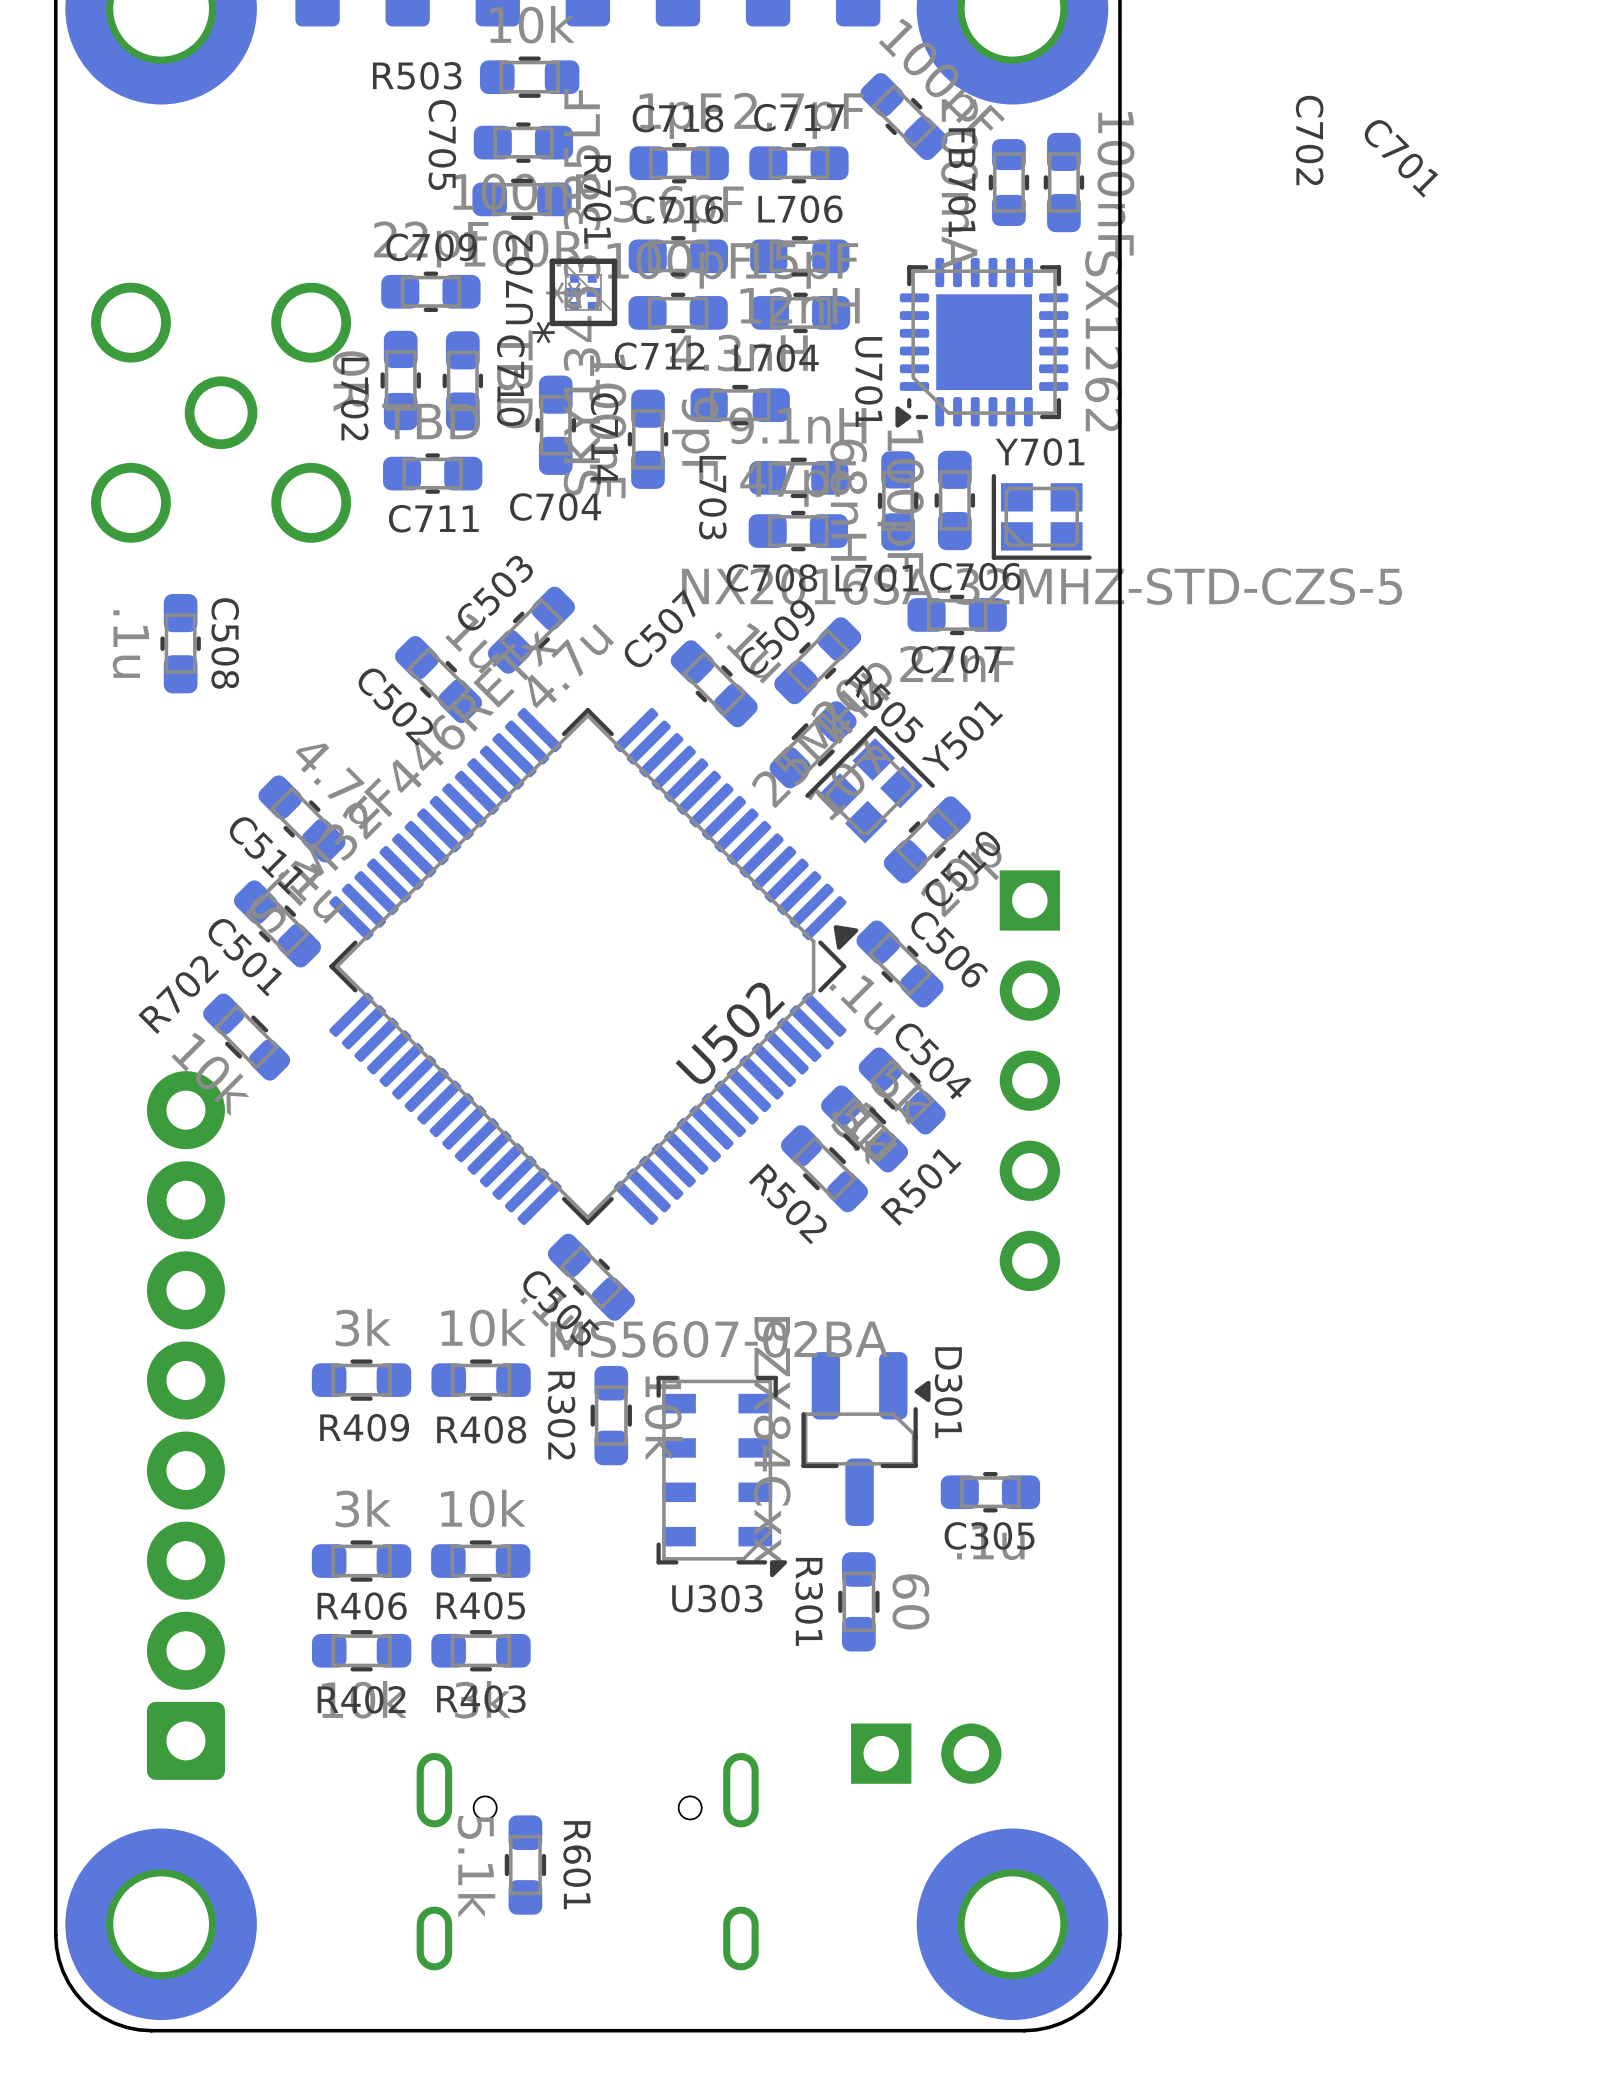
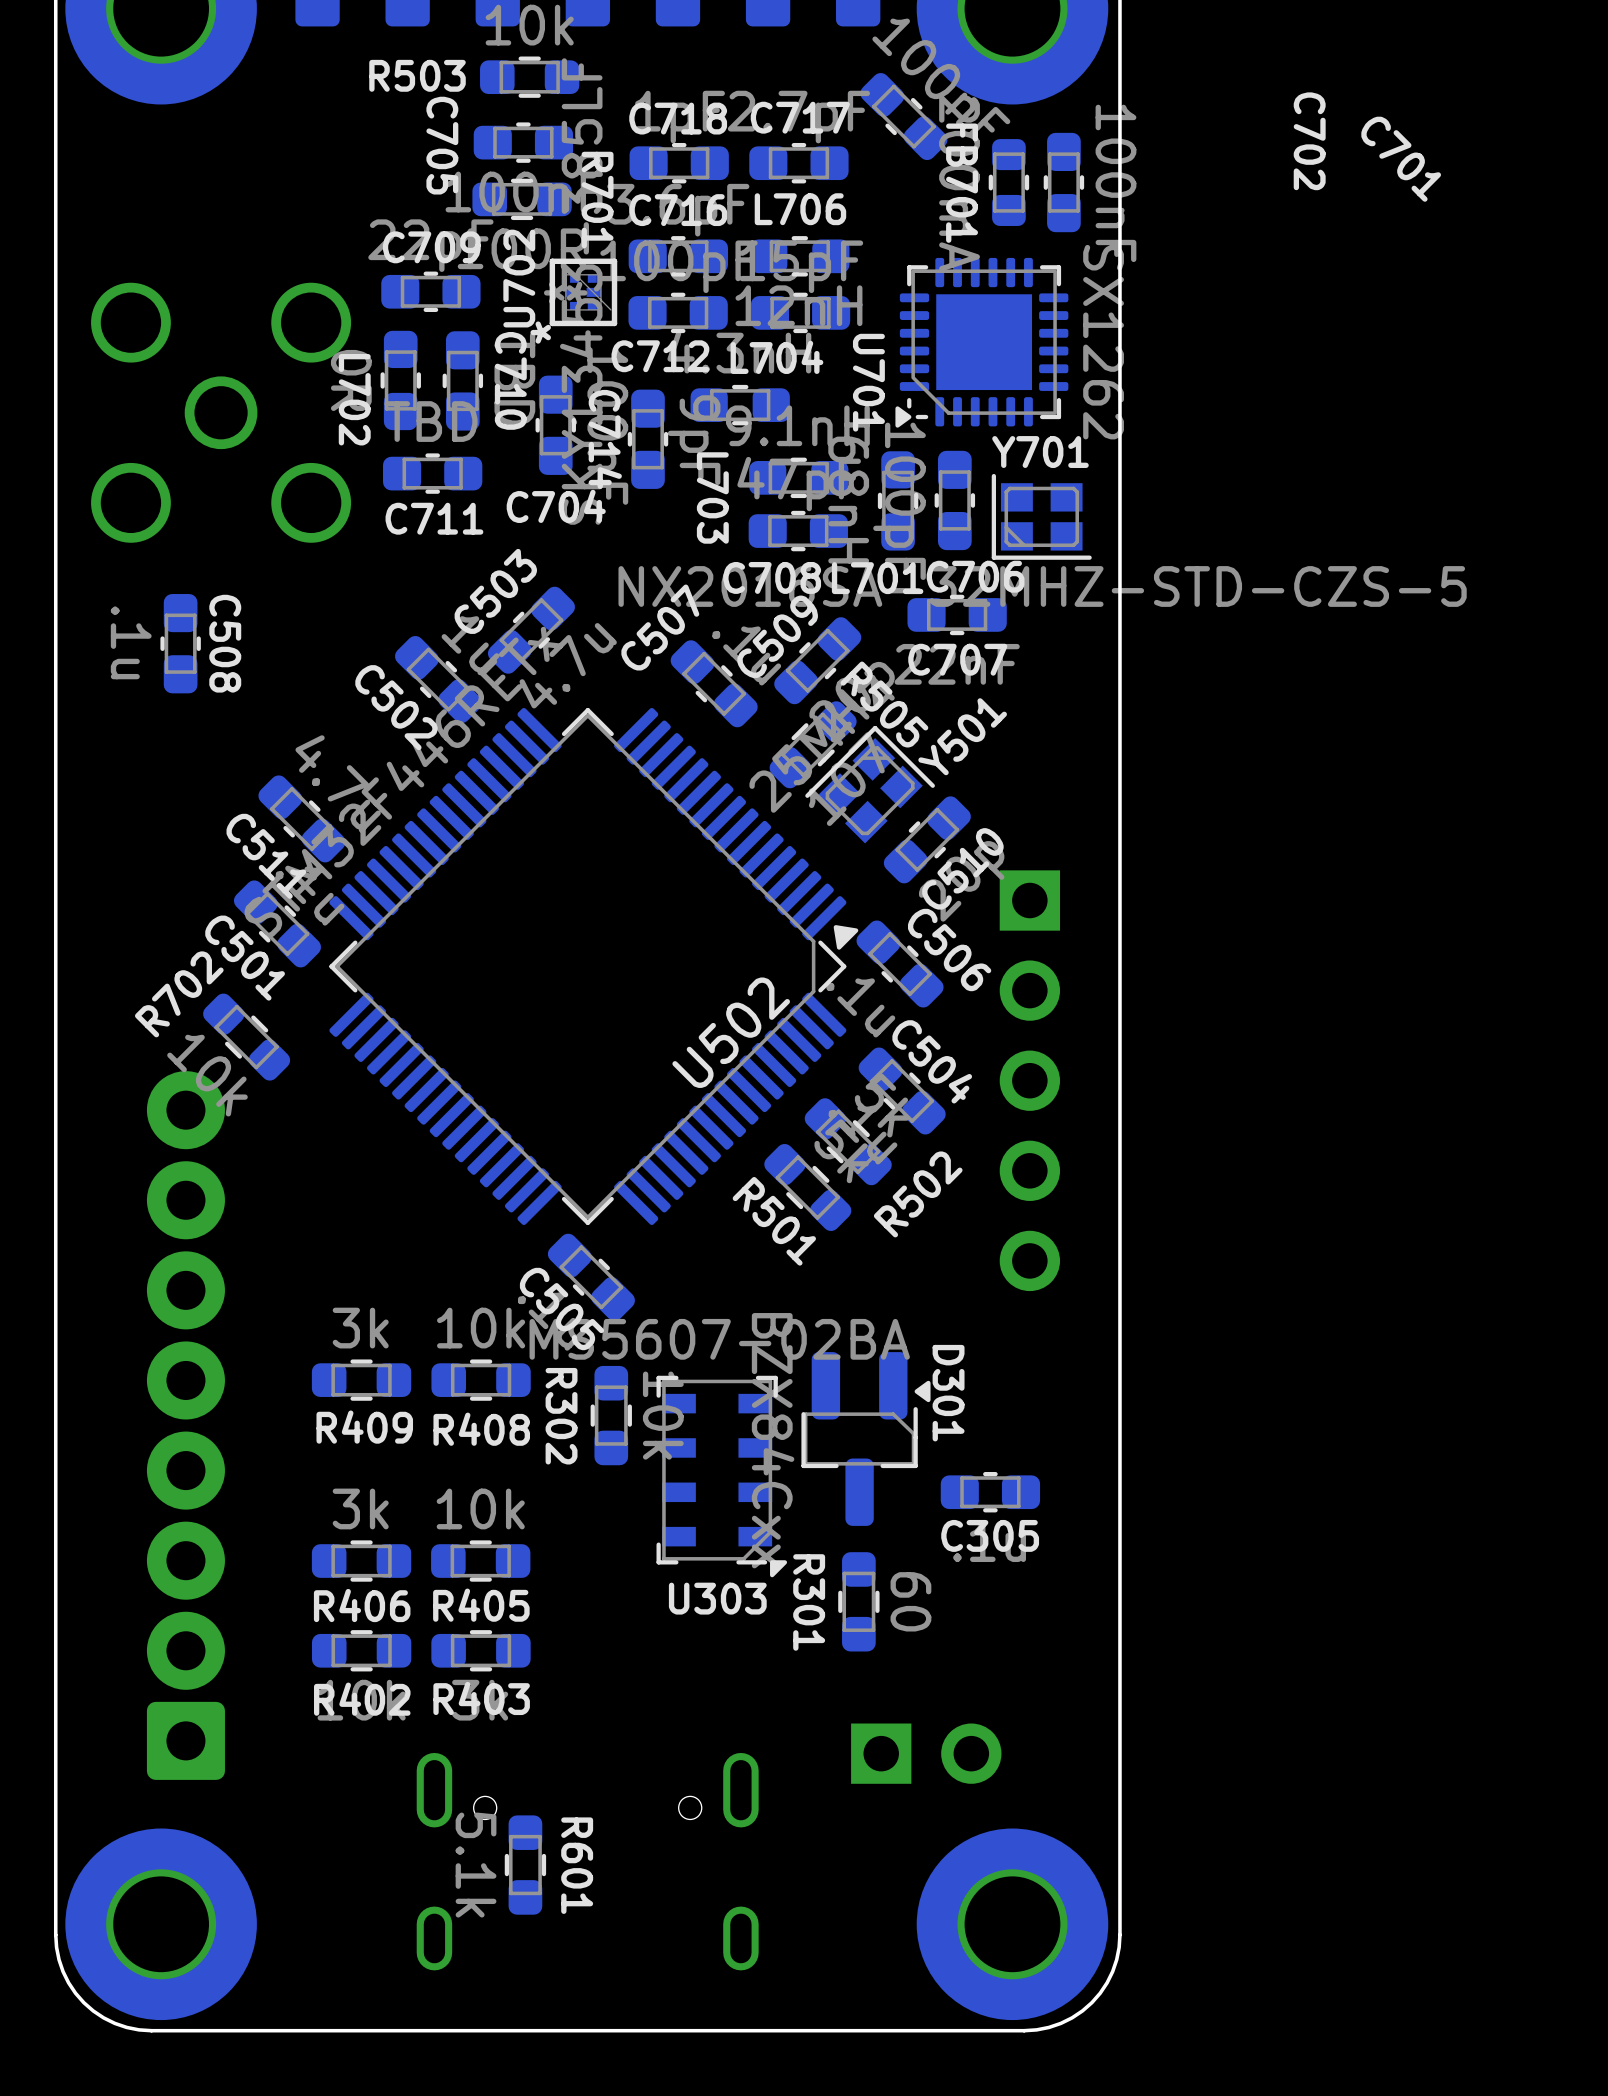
R501 position: (864, 1128) -> (807, 1187)
R502 position: (824, 1168) -> (848, 1141)
R501 name rotation: 0° (921, 1187) -> 90° clockwise (774, 1221)
R502 name rotation: 0° (787, 1203) -> 90° counterclockwise (918, 1194)

